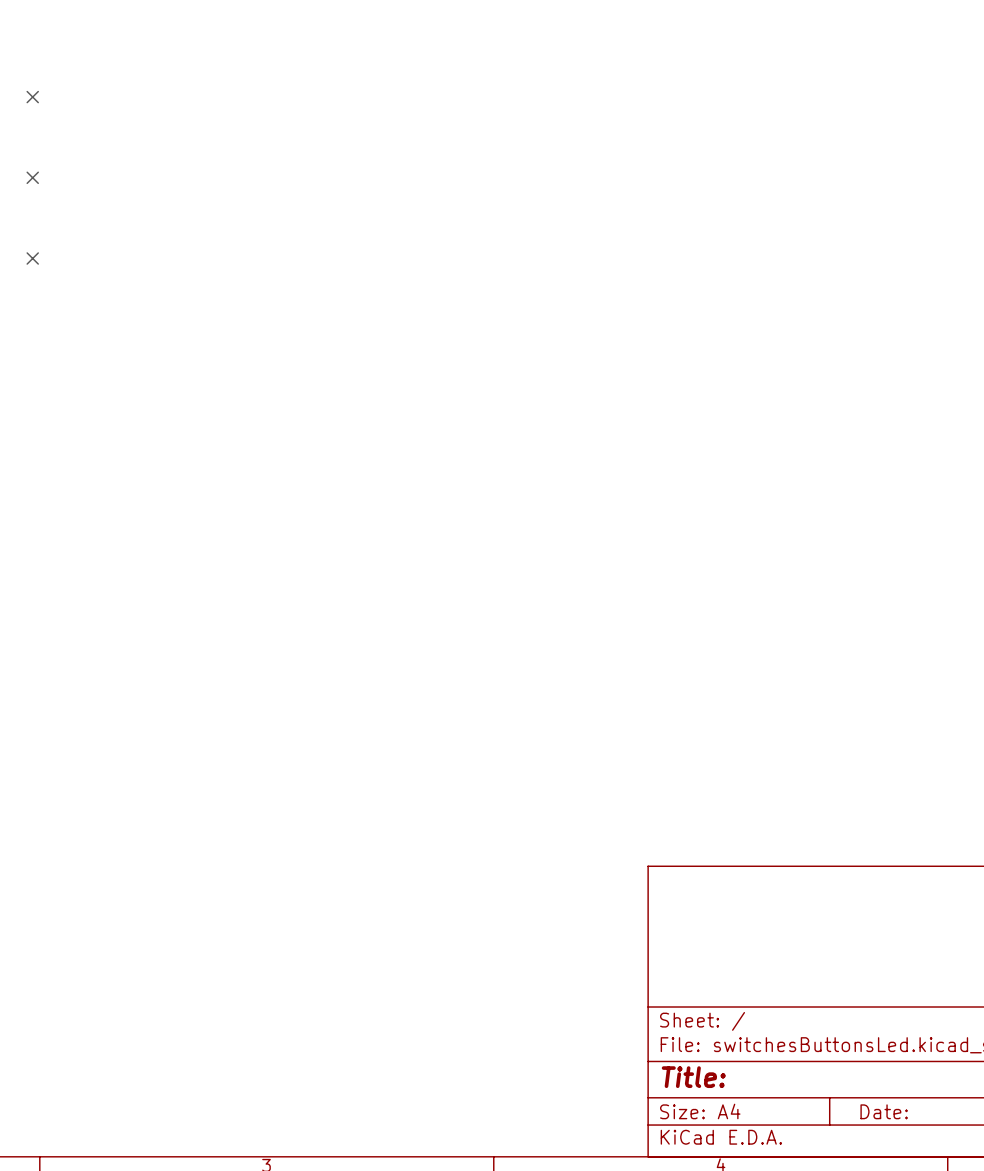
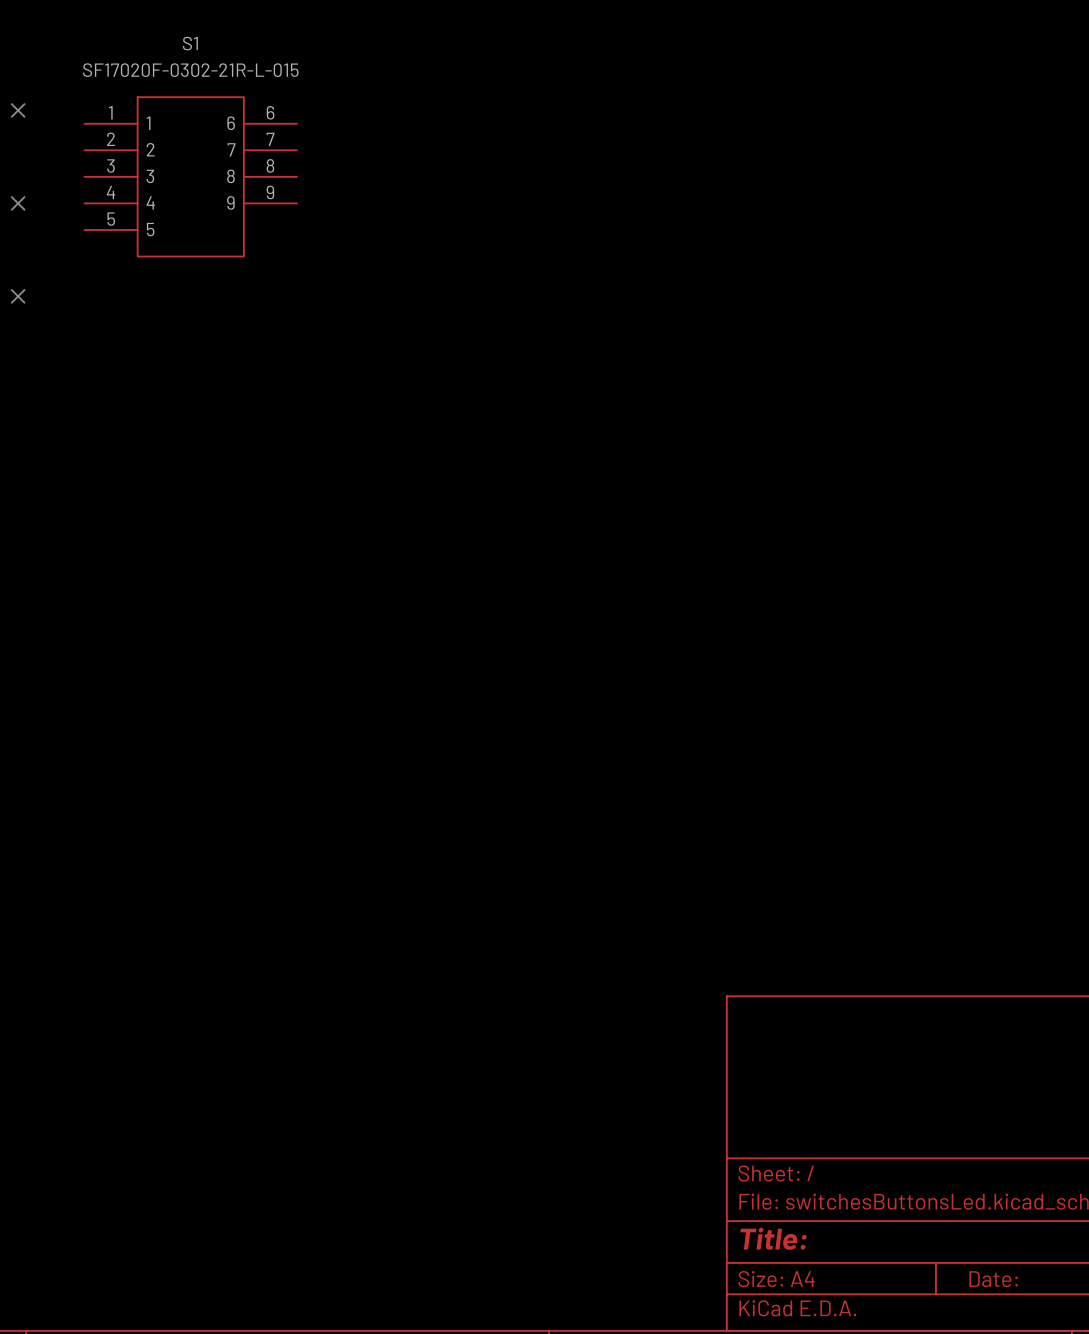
S1: none -> SF17020F-0302-21R-L-015 (190, 176)

